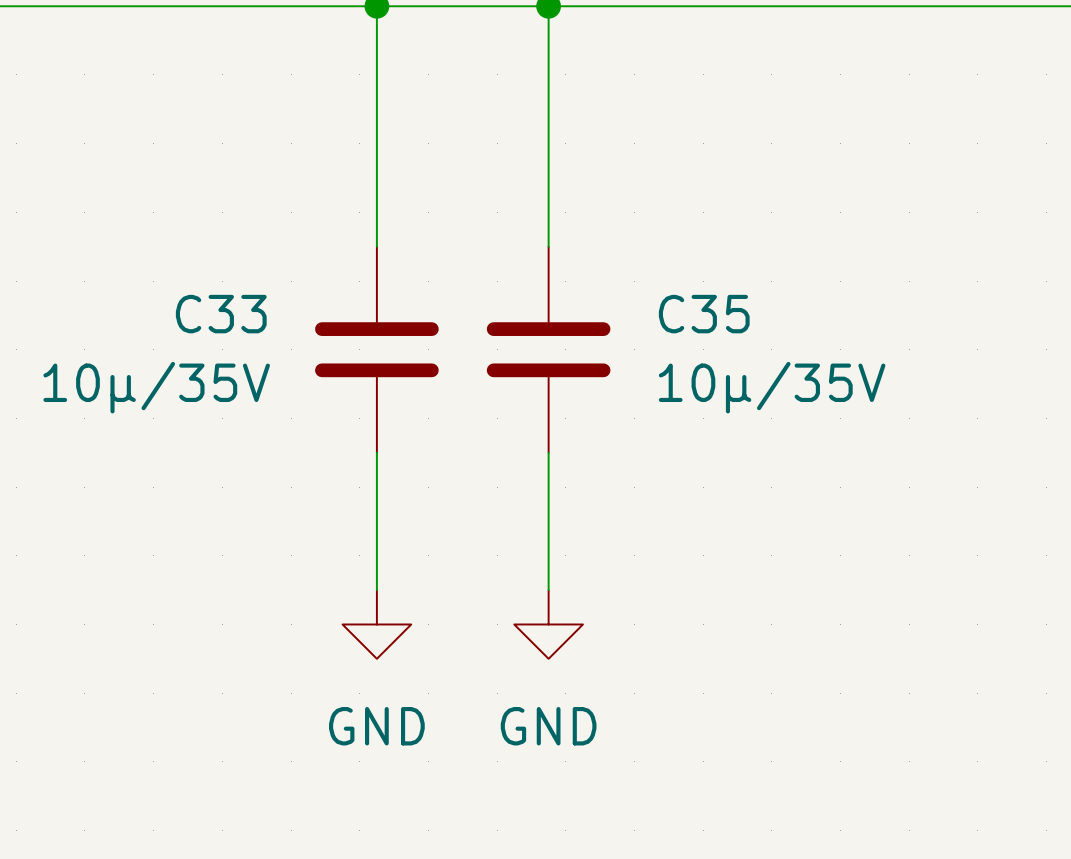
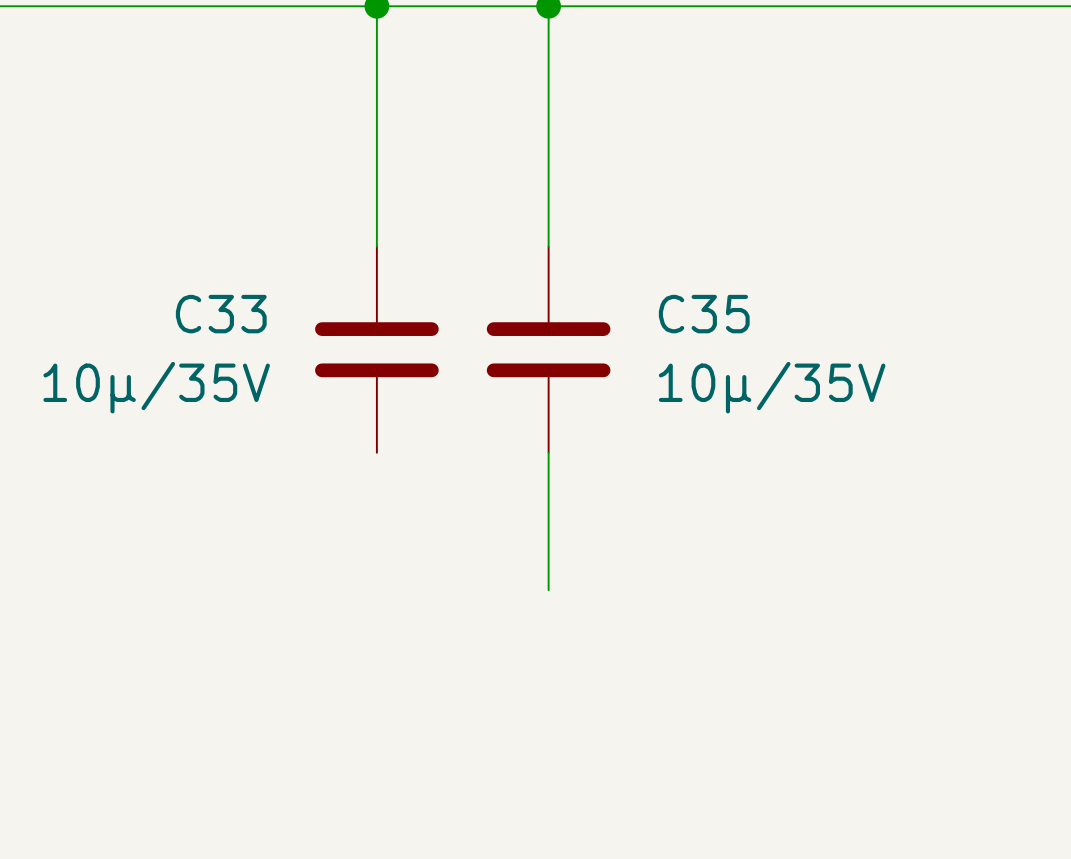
wire: (376, 452) (376, 590) -> none
power symbol: GND (376, 624) -> none
power symbol: GND (548, 624) -> none

